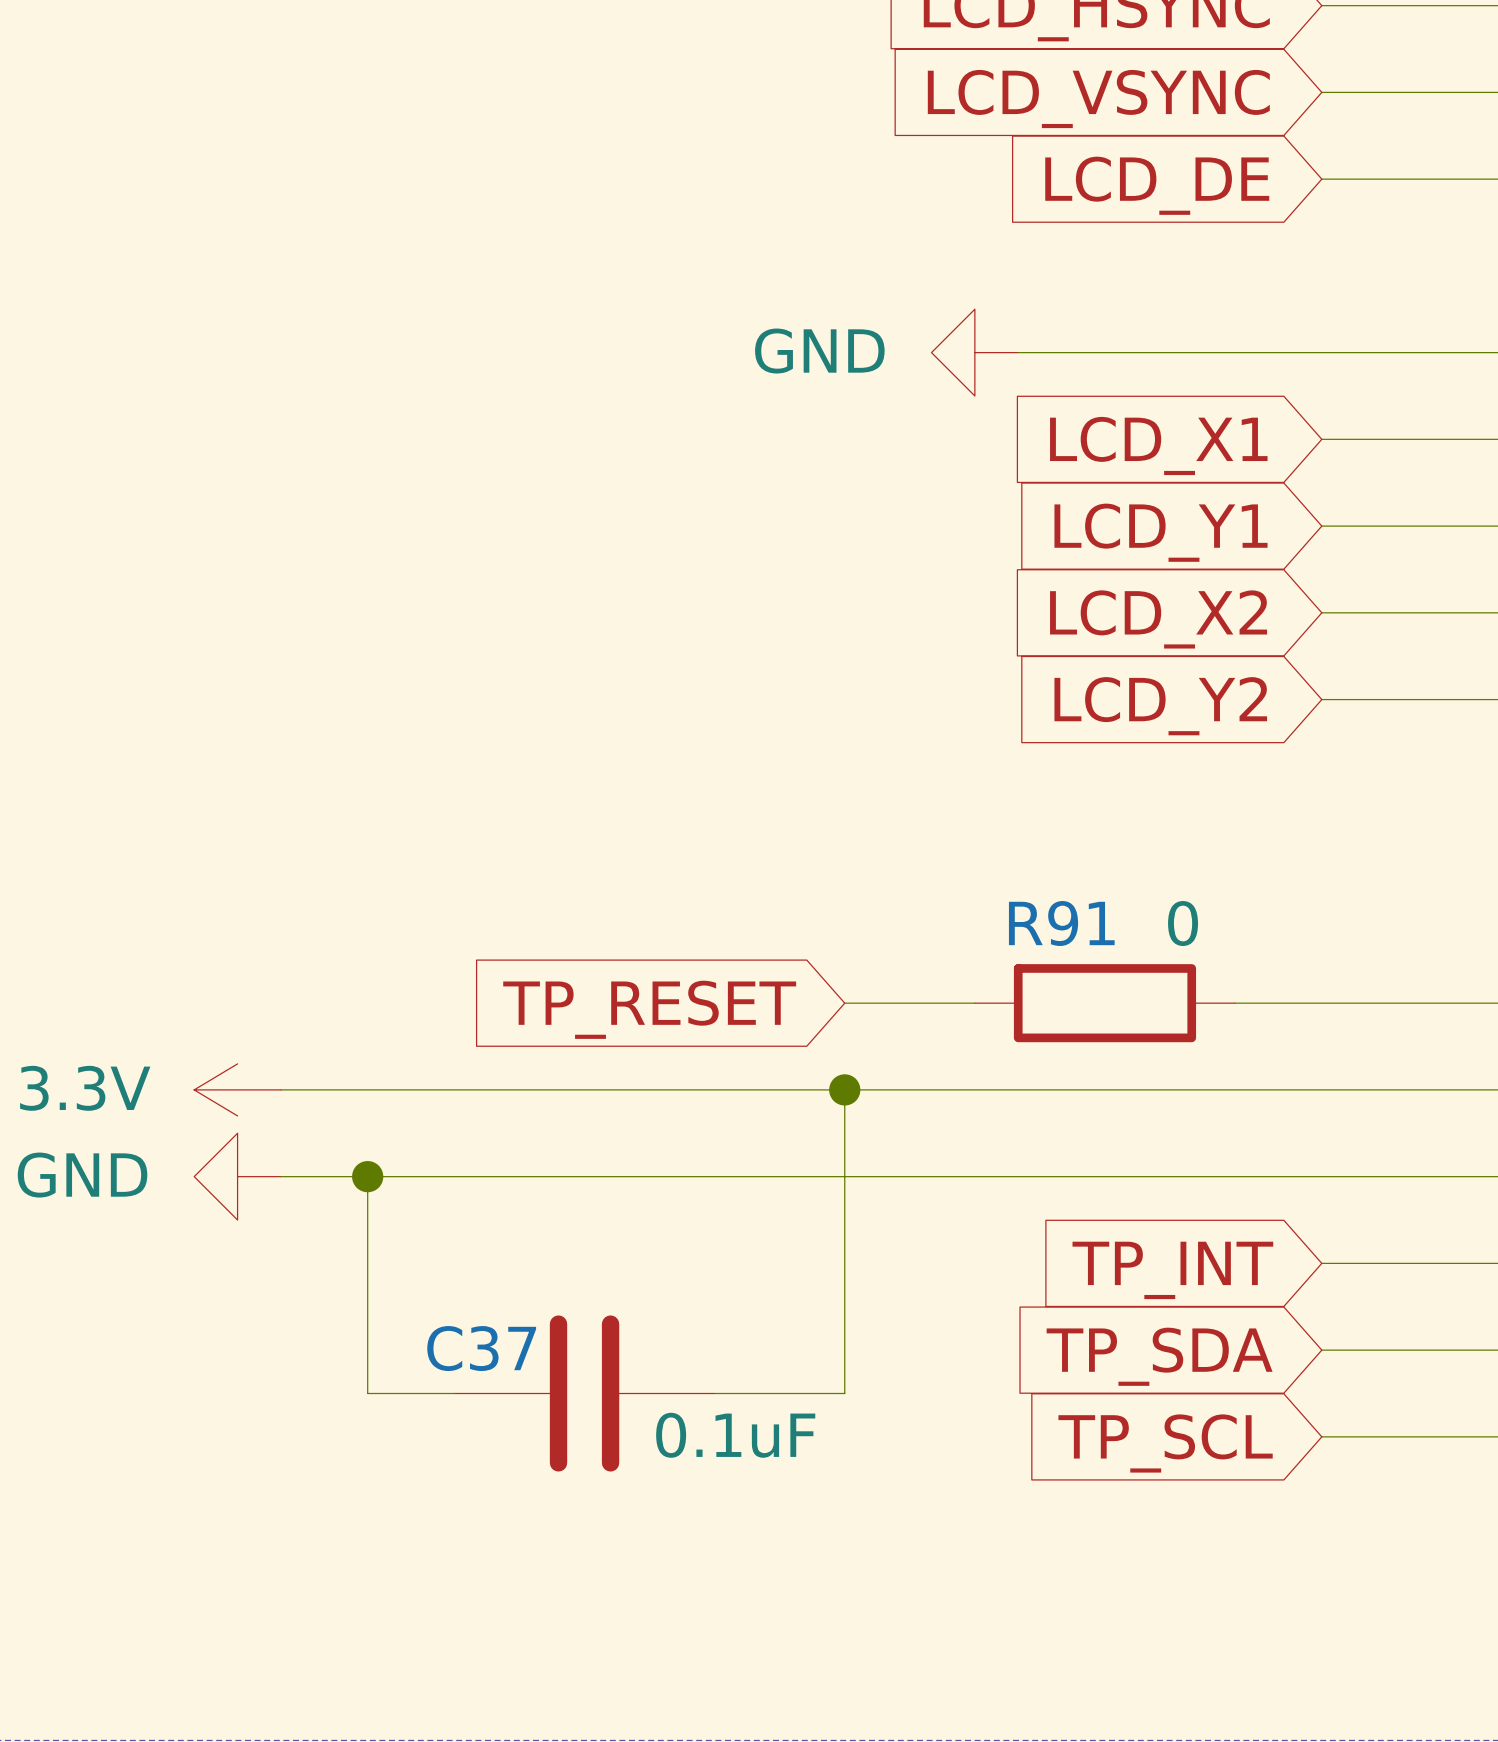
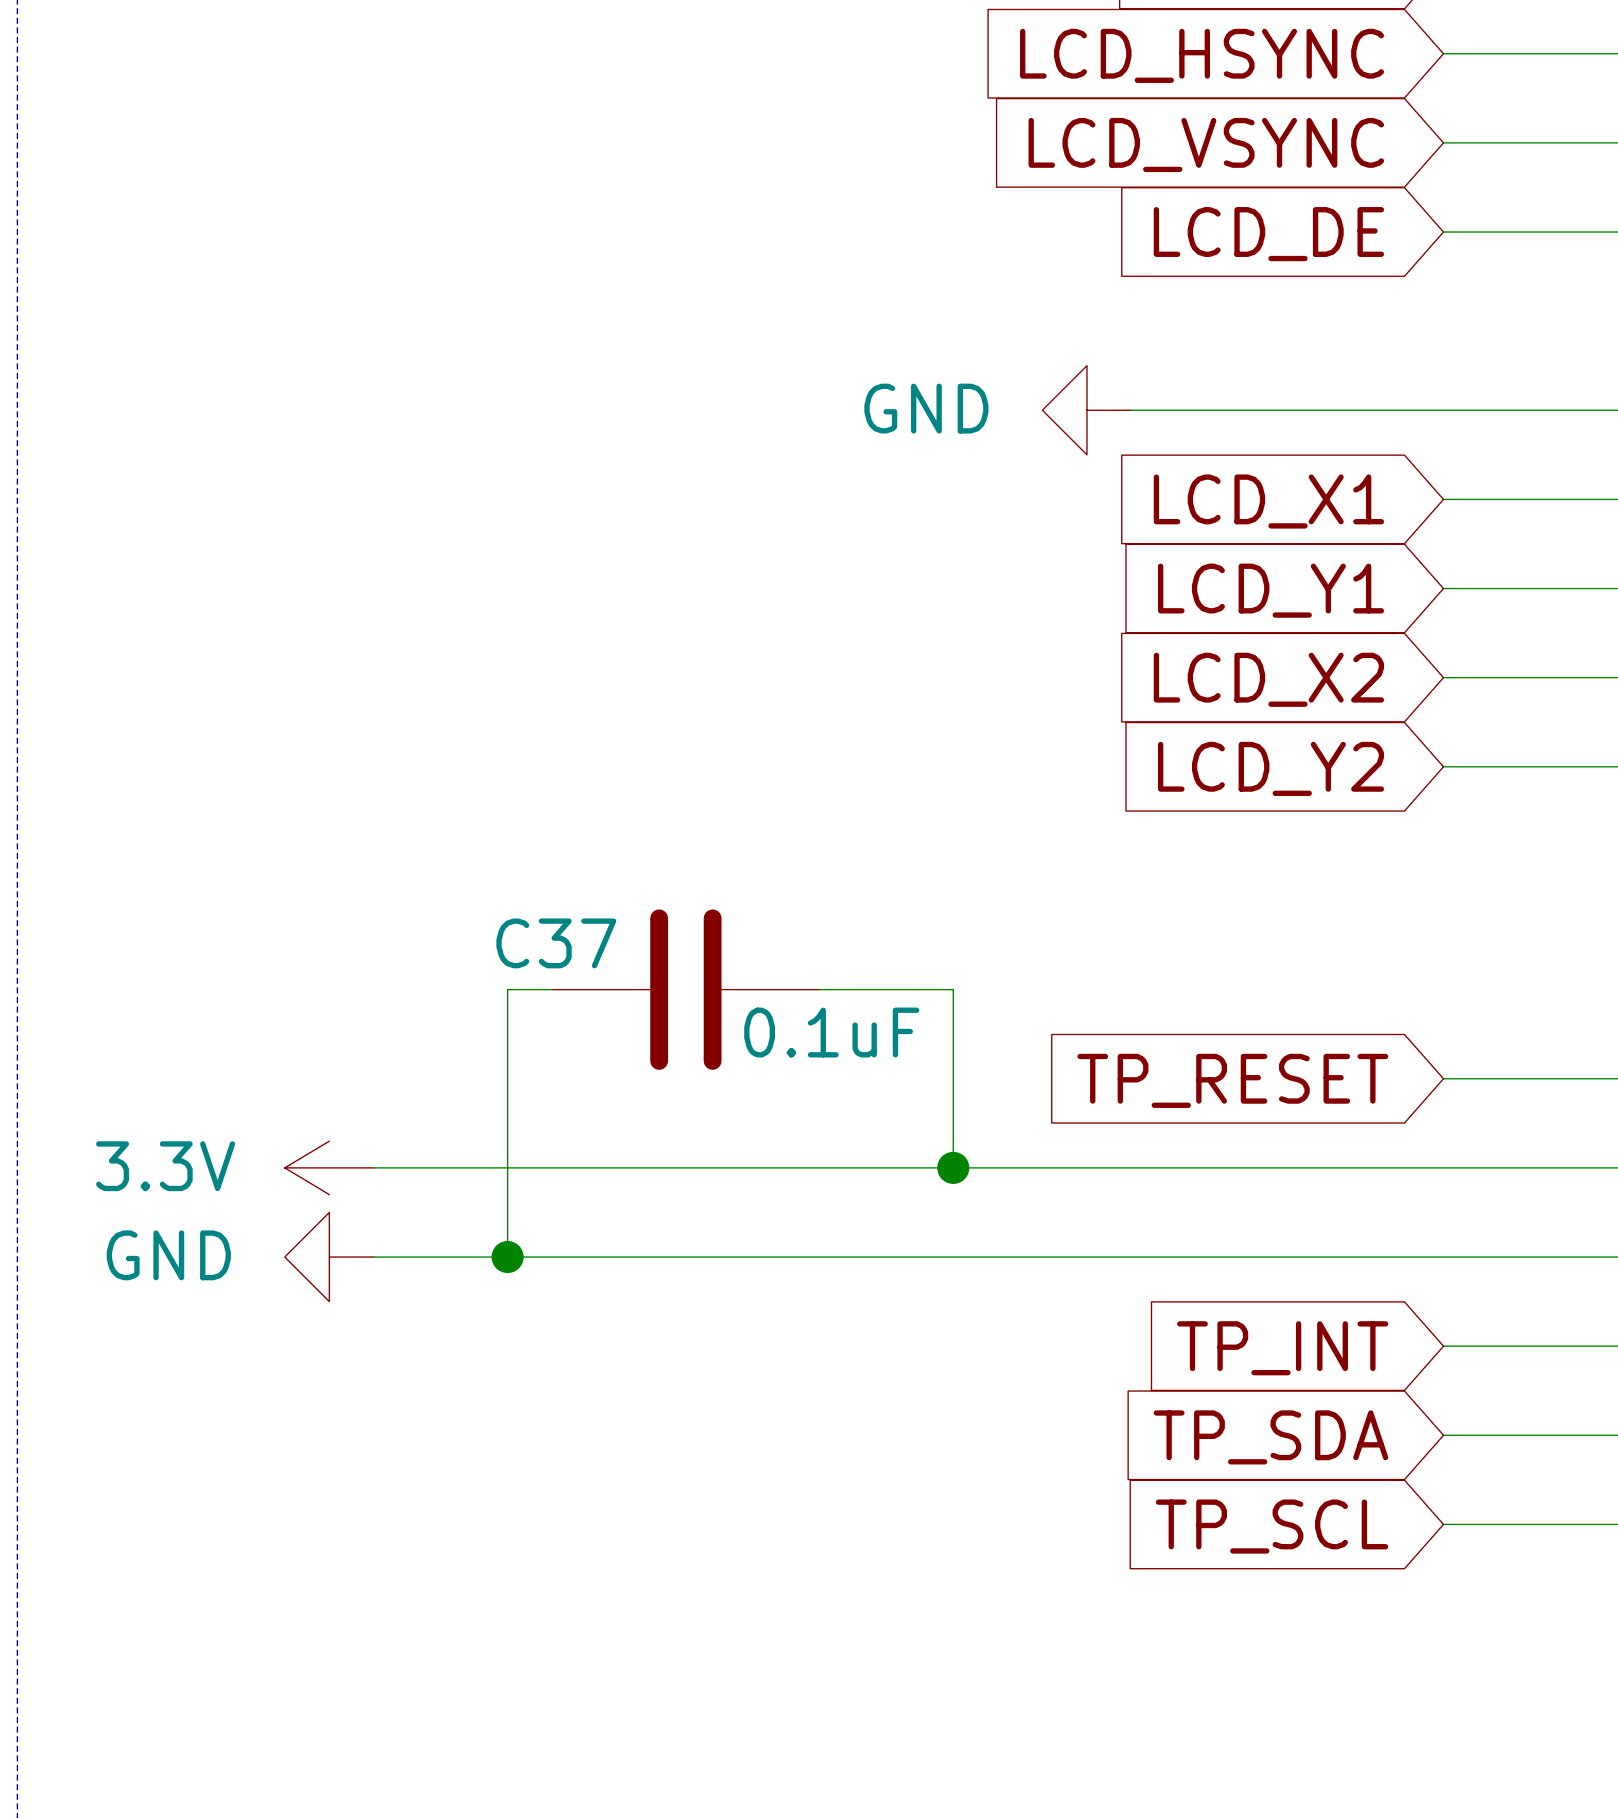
wire: none -> (552, 989) (507, 989) (507, 1257)
wire: (844, 1003) (974, 1003) -> none
R91: 0 (1104, 1003) -> none
wire: (1235, 1003) (1321, 1003) -> none
global label position: TP_RESET (649, 1009) -> TP_RESET (1232, 1080)
wire: (844, 1089) (844, 1393) (714, 1393) -> (953, 1167) (953, 989) (819, 989)
wire: (367, 1176) (367, 1393) (454, 1393) -> none
junction position: (367, 1176) -> (507, 1257)
C37 name position: C37 (481, 1348) -> C37 (556, 943)
C37 position: (584, 1393) -> (685, 989)

